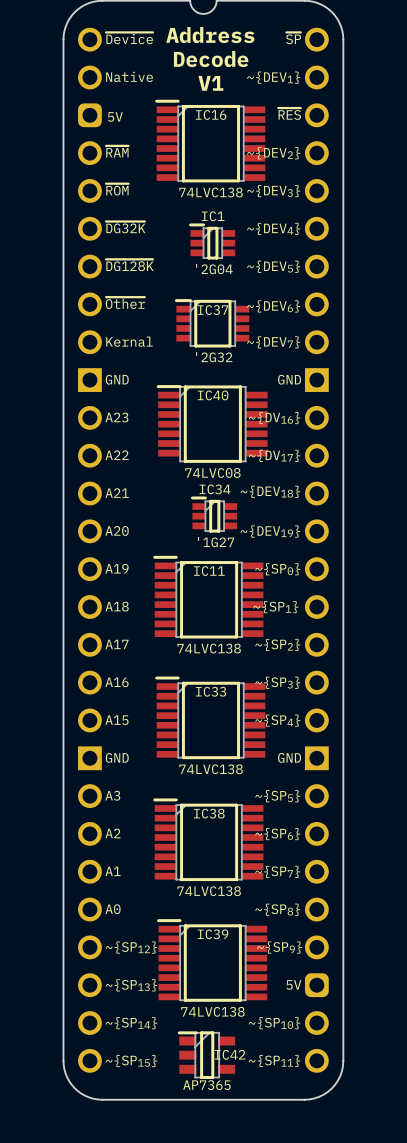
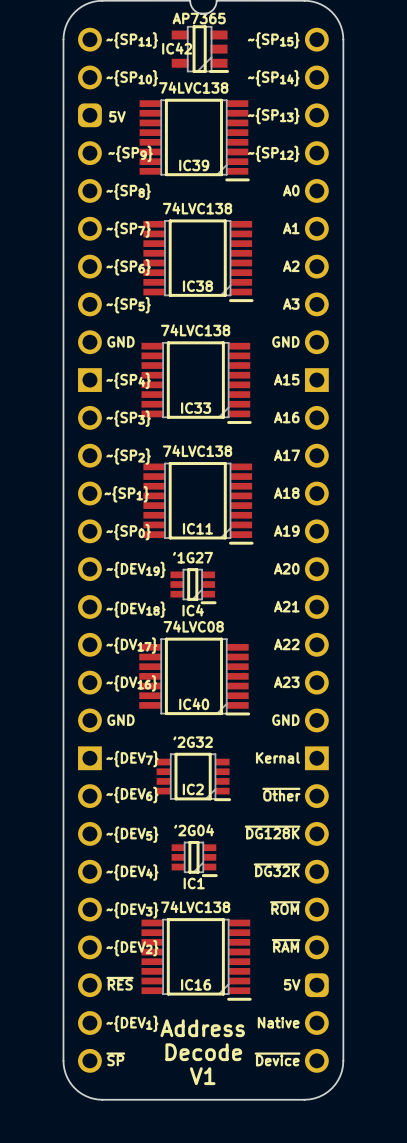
text: Address (210, 35) -> none
text: ~{Device} (129, 38) -> ~{SP11} (132, 40)
text: ~{SP} (293, 38) -> ~{SP15} (273, 40)
text: Decode (211, 59) -> none
text: Native (129, 76) -> ~{SP10} (132, 78)
text: ~{DEV1} (273, 77) -> ~{SP14} (273, 78)
text: V1 (210, 83) -> none
text: ~{RES} (289, 113) -> ~{SP13} (273, 116)
IC16 rotation: 0° (210, 141) -> 180° (196, 959)
IC16 position: (210, 141) -> (196, 959)
text: ~{RAM} (117, 151) -> ~{SP9} (130, 153)
text: ~{DEV2} (273, 153) -> ~{SP12} (273, 153)
text: ~{ROM} (117, 189) -> ~{SP8} (128, 191)
text: ~{DEV3} (273, 191) -> A0 (291, 190)
text: ~{DG32K} (125, 227) -> ~{SP7} (128, 229)
text: ~{DEV4} (273, 228) -> A1 (291, 228)
IC1 rotation: 0° (212, 241) -> 180° (194, 859)
IC1 position: (212, 241) -> (194, 859)
text: ~{DG128K} (129, 265) -> ~{SP6} (128, 267)
text: ~{DEV5} (273, 266) -> A2 (291, 266)
text: ~{Other} (125, 303) -> ~{SP5} (128, 305)
text: ~{DEV6} (273, 306) -> A3 (291, 304)
IC37: (212, 323) -> none
text: Kernal (129, 341) -> GND (120, 341)
text: ~{DEV7} (273, 342) -> GND (285, 341)
text: GND (117, 379) -> ~{SP4} (128, 380)
text: GND (289, 379) -> A15 (286, 379)
text: A23 (116, 417) -> ~{SP3} (128, 418)
text: ~{DV16} (274, 418) -> A16 (286, 417)
IC40 rotation: 0° (212, 423) -> 180° (194, 676)
IC40 position: (212, 423) -> (194, 676)
text: A22 (117, 455) -> ~{SP2} (128, 456)
text: ~{DV17} (274, 455) -> A17 (287, 455)
text position: ~{DEV18} (270, 491) -> ~{DEV18} (136, 609)
text position: A21 (117, 493) -> A21 (286, 606)
IC34: (214, 514) -> none
text: A20 (117, 530) -> ~{SP0} (128, 532)
text: ~{DEV19} (270, 531) -> A19 (286, 530)
text: A19 (117, 568) -> ~{DEV19} (136, 569)
text: ~{SP0} (277, 569) -> A20 (286, 568)
IC4: none -> (193, 586)
IC11 rotation: 0° (208, 597) -> 180° (198, 503)
IC11 position: (208, 597) -> (198, 503)
text position: A18 (117, 606) -> A18 (286, 493)
text position: ~{SP1} (275, 607) -> ~{SP1} (126, 494)
text: A17 (117, 644) -> ~{DV17} (131, 645)
text: ~{SP2} (277, 644) -> A22 (286, 644)
text: A16 (117, 682) -> ~{DV16} (131, 683)
text: ~{SP3} (277, 682) -> A23 (286, 682)
IC33 rotation: 0° (210, 717) -> 180° (196, 382)
IC33 position: (210, 717) -> (196, 382)
text: A15 (117, 720) -> GND (120, 720)
text: ~{SP4} (277, 720) -> GND (285, 720)
text: GND (117, 757) -> ~{DEV7} (132, 759)
text: GND (289, 757) -> Kernal (277, 757)
IC2: none -> (193, 776)
text: A3 (112, 795) -> ~{DEV6} (132, 794)
text: ~{SP5} (277, 796) -> ~{Other} (281, 794)
text: A2 (112, 833) -> ~{DEV5} (132, 834)
text: ~{SP6} (277, 834) -> ~{DG128K} (272, 832)
IC38 rotation: 0° (208, 839) -> 180° (198, 260)
IC38 position: (208, 839) -> (198, 260)
text: A1 (113, 871) -> ~{DEV4} (132, 872)
text: ~{SP7} (277, 871) -> ~{DG32K} (277, 870)
text: A0 (113, 909) -> ~{DEV3} (132, 910)
text: ~{SP8} (277, 909) -> ~{ROM} (285, 908)
text: ~{SP12} (131, 947) -> ~{DEV2} (132, 948)
text: ~{SP9} (279, 947) -> ~{RAM} (286, 945)
IC39 rotation: 0° (212, 960) -> 180° (194, 140)
IC39 position: (212, 960) -> (194, 140)
text: ~{SP13} (131, 985) -> ~{RES} (120, 983)
text: ~{SP14} (131, 1023) -> ~{DEV1} (132, 1023)
text: ~{SP10} (274, 1023) -> Native (278, 1022)
text: none -> Address (202, 1028)
text: none -> Decode (203, 1052)
IC42 rotation: 0° (206, 1055) -> 180° (200, 49)
IC42 position: (206, 1055) -> (200, 49)
text: ~{SP15} (131, 1061) -> ~{SP} (115, 1059)
text: ~{SP11} (274, 1061) -> ~{Device} (277, 1059)
text: none -> V1 (202, 1076)

